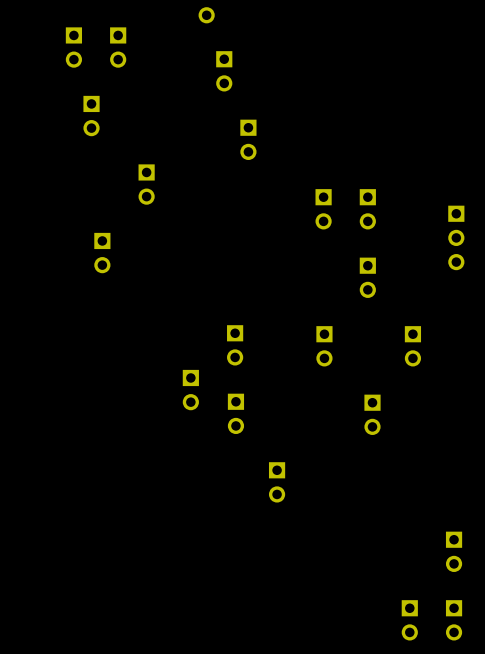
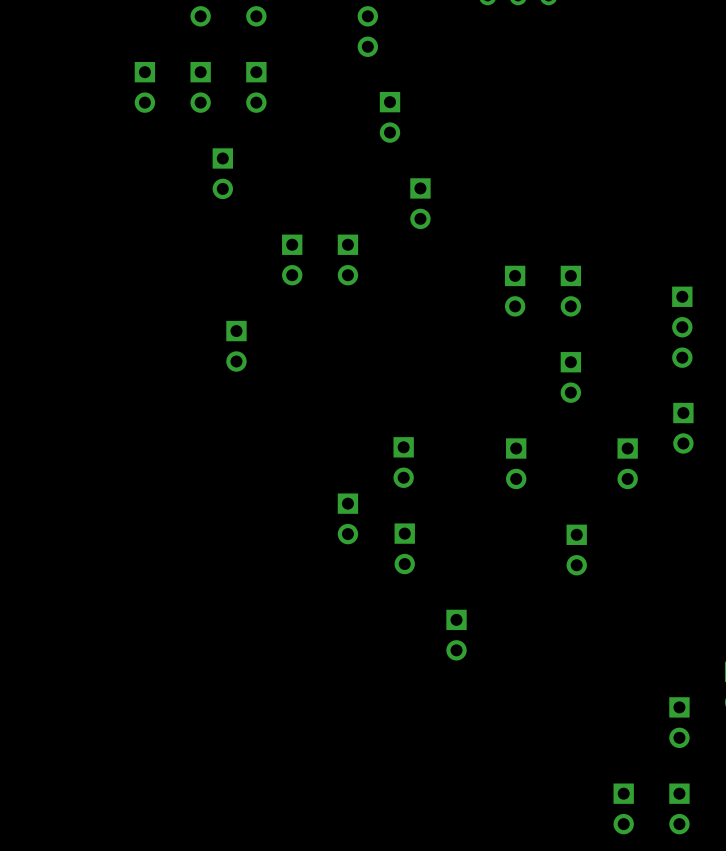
part: none -> (144, 87)
part: none -> (347, 259)
part: none -> (683, 428)

